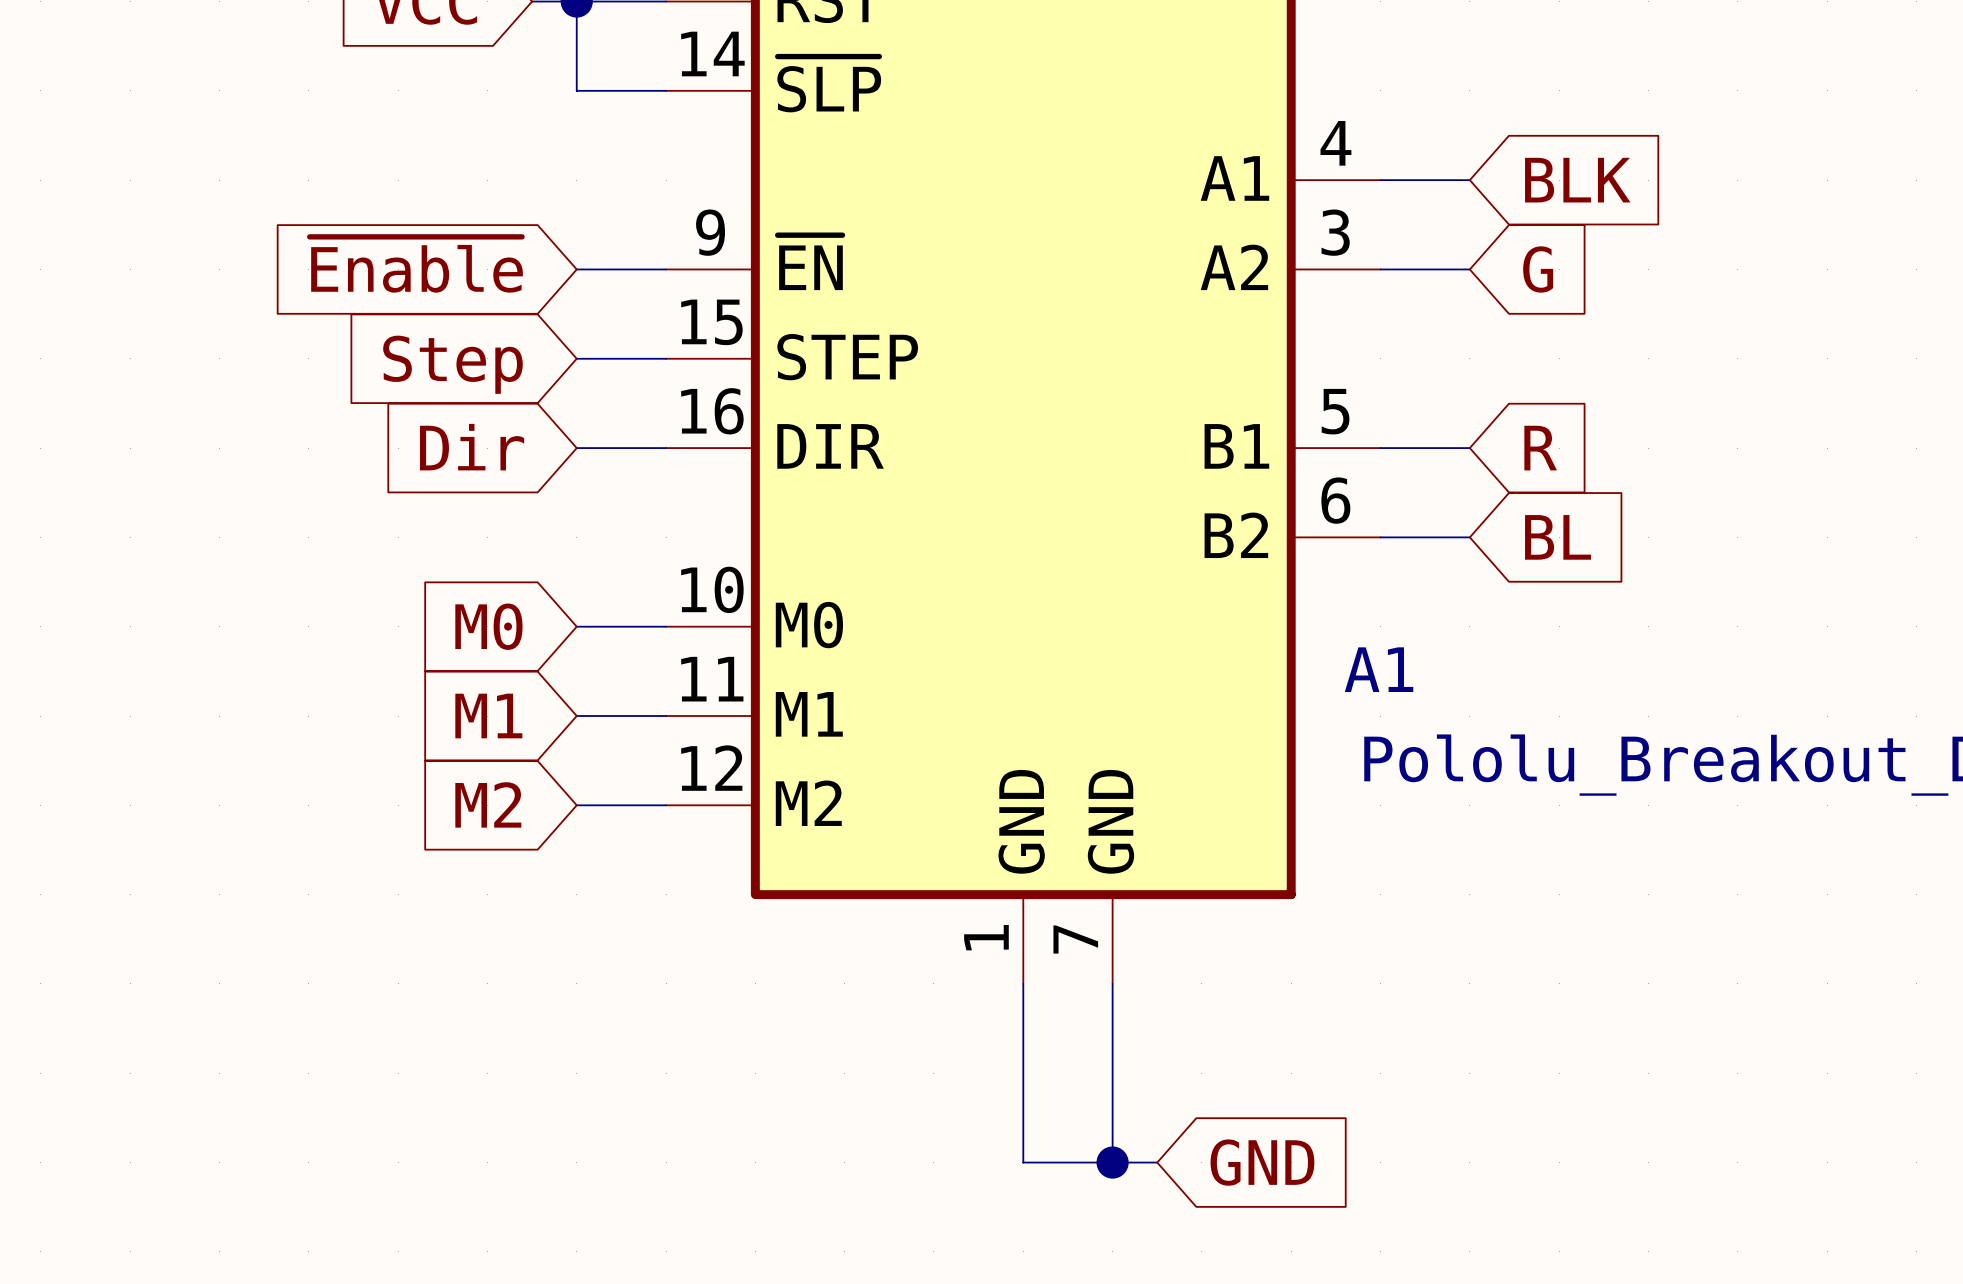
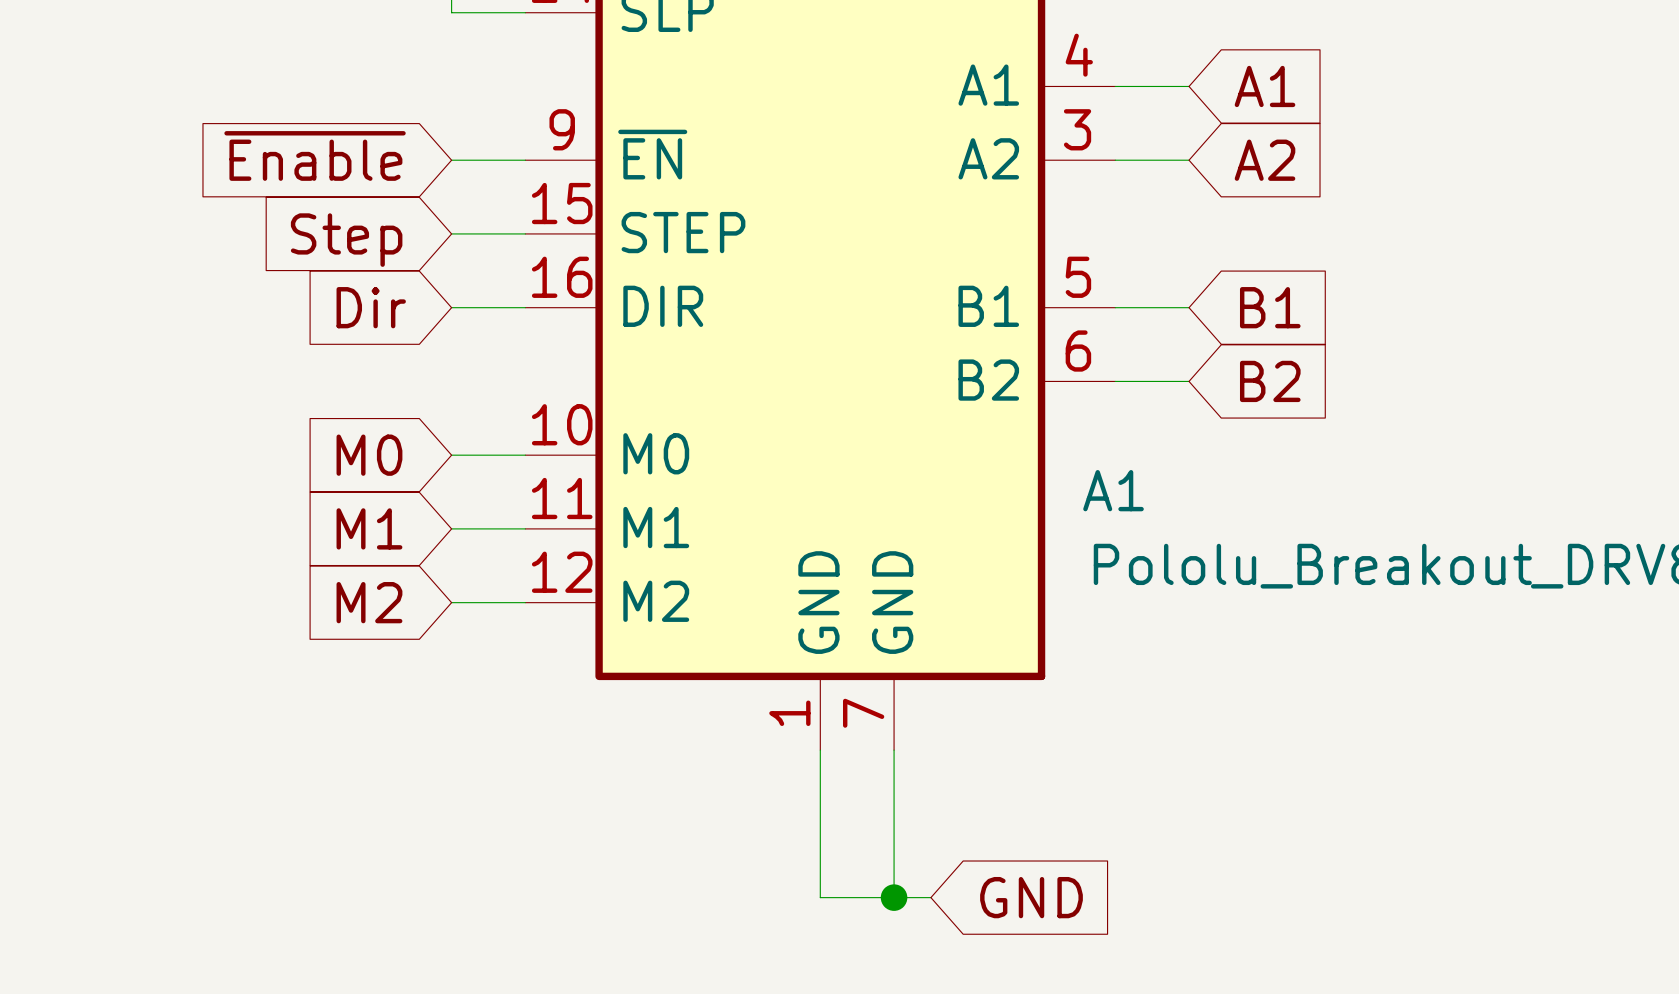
global label: BLK (1577, 180) -> A1 (1265, 86)
global label: G (1538, 269) -> A2 (1265, 160)
global label: R (1540, 448) -> B1 (1270, 307)
global label: BL (1558, 537) -> B2 (1270, 381)

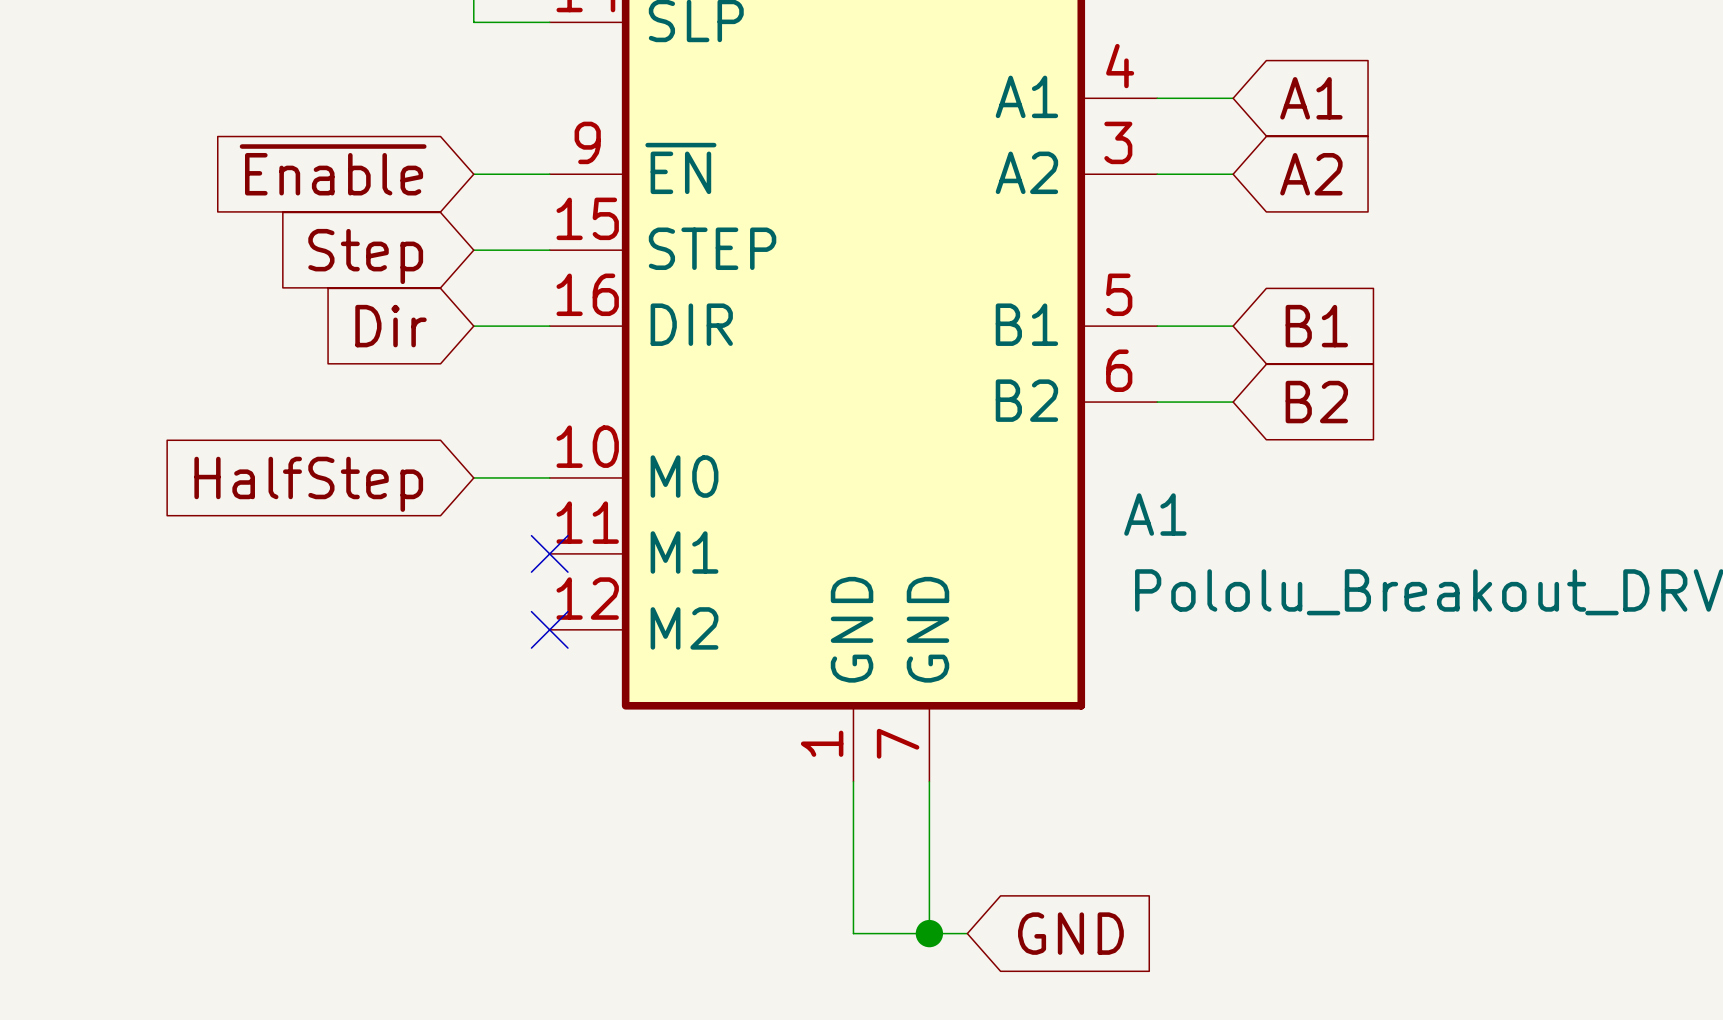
global label: M0 (369, 455) -> HalfStep (308, 484)
global label: M1 (369, 528) -> none
wire: (451, 528) (525, 528) -> none
no-connect mark: none -> (549, 553)
global label: M2 (369, 602) -> none
wire: (451, 602) (525, 602) -> none
no-connect mark: none -> (549, 629)

